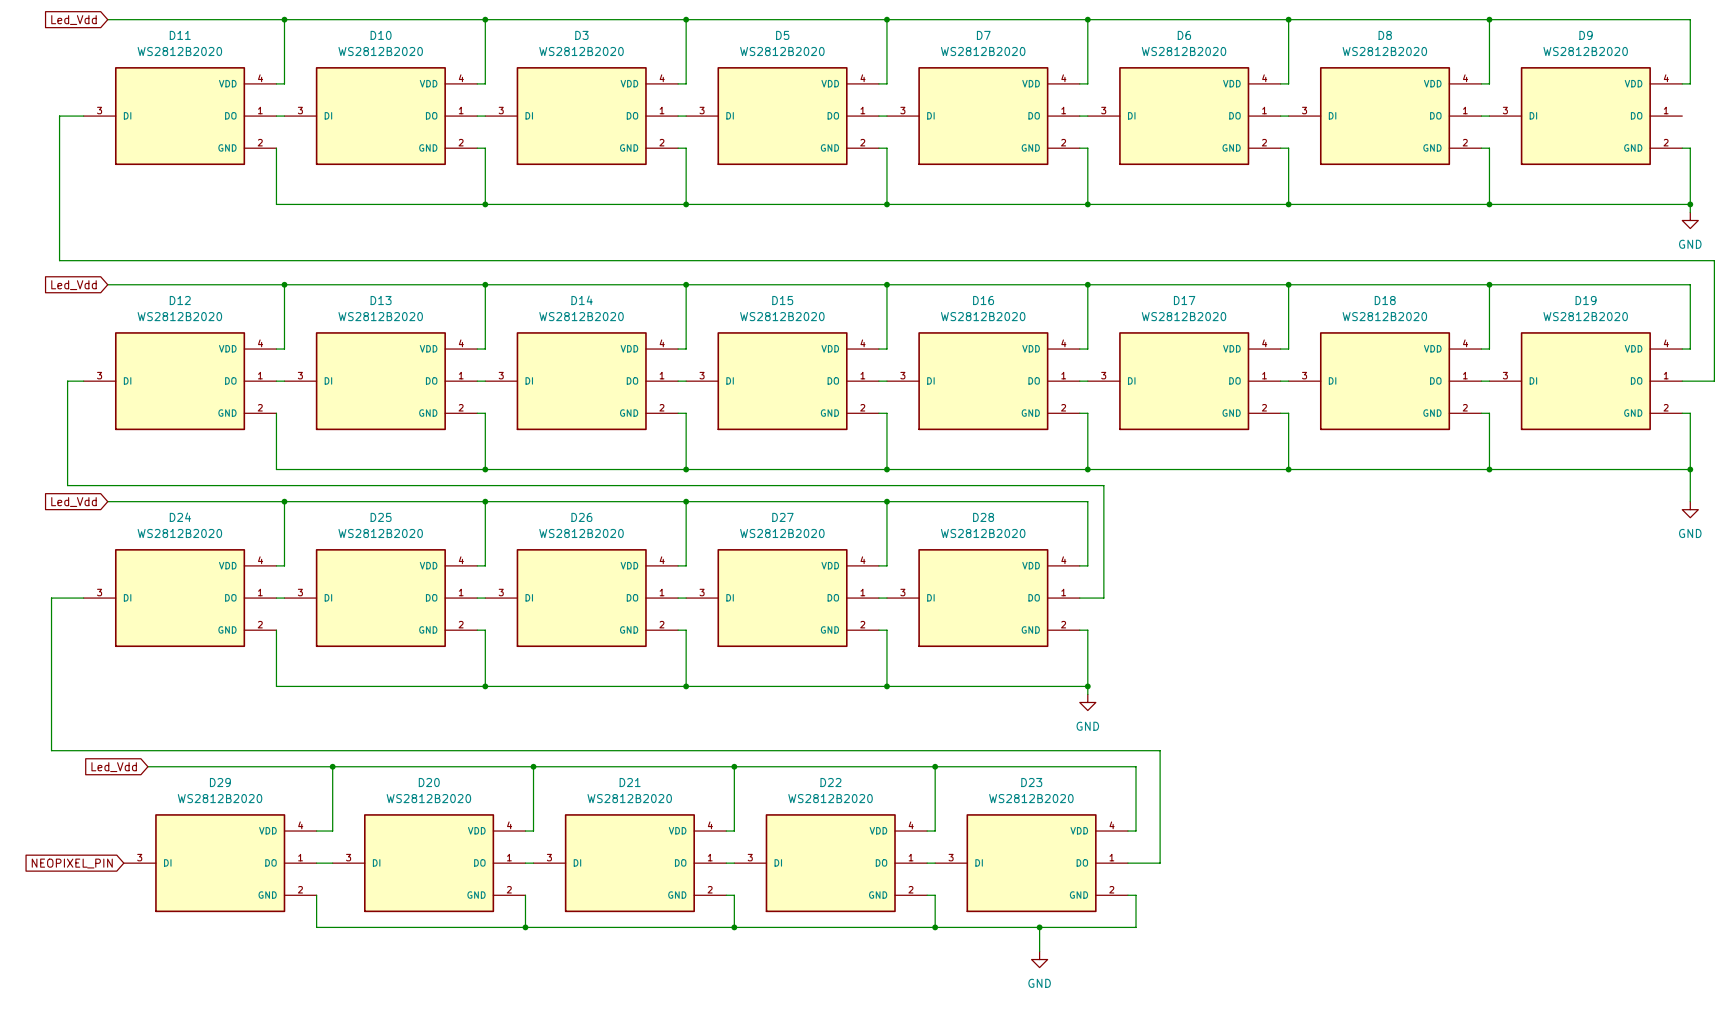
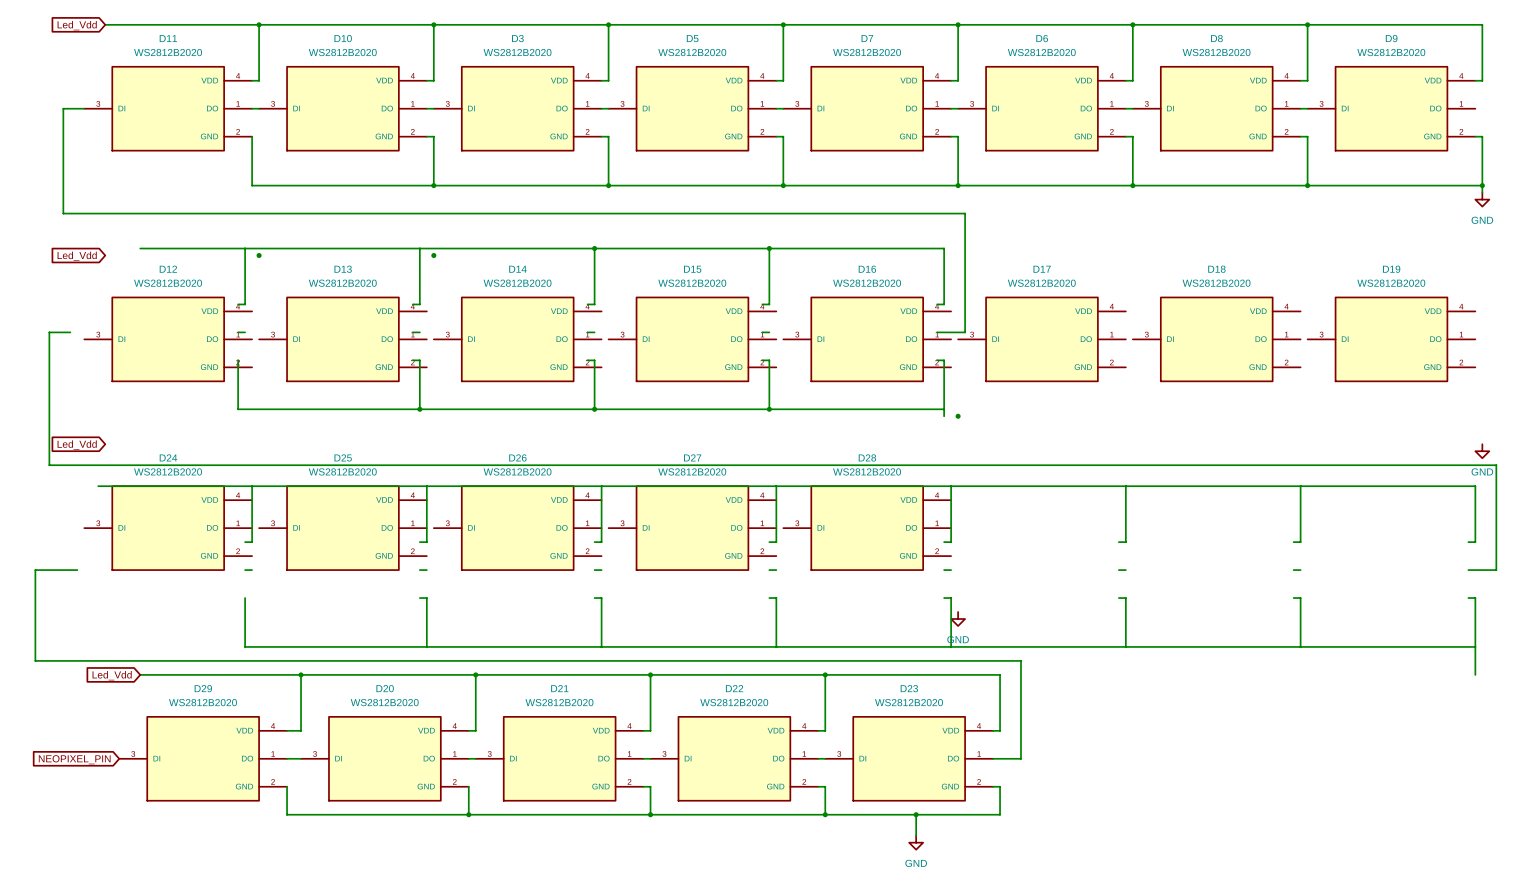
wire: (59, 236) (59, 260) (1714, 260) (1714, 381) (1682, 381) -> (63, 213) (965, 213) (965, 332) (937, 332)
wire: none -> (140, 248) (944, 248) (944, 304) (937, 304)
wire: (107, 284) (1690, 284) (1690, 349) (1682, 349) -> none
wire: (284, 284) (284, 349) (276, 349) -> (245, 248) (245, 304) (238, 304)
wire: (485, 284) (485, 349) (477, 349) -> (419, 248) (419, 304) (412, 304)
wire: (686, 284) (686, 349) (678, 349) -> (594, 248) (594, 304) (587, 304)
junction position: (686, 284) -> (594, 248)
wire: (886, 284) (886, 349) (878, 349) -> (769, 248) (769, 304) (762, 304)
junction position: (886, 284) -> (769, 248)
wire: (1087, 284) (1087, 349) (1079, 349) -> none
junction: (1087, 284) -> none
wire: (1288, 284) (1288, 349) (1280, 349) -> none
junction: (1288, 284) -> none
wire: (1489, 284) (1489, 349) (1481, 349) -> none
junction: (1489, 284) -> none
wire: none -> (70, 332) (49, 332) (49, 465) (1496, 465) (1496, 570) (1468, 570)
wire: (83, 381) (67, 381) (67, 485) (1103, 485) (1103, 598) (1079, 598) -> none
wire: (276, 381) (284, 381) -> (238, 332) (245, 332)
wire: (477, 381) (485, 381) -> (412, 332) (419, 332)
wire: (678, 381) (686, 381) -> (587, 332) (594, 332)
wire: (878, 381) (886, 381) -> (762, 332) (769, 332)
wire: (1079, 381) (1087, 381) -> none
wire: (1280, 381) (1288, 381) -> none
wire: (1481, 381) (1489, 381) -> none
wire: none -> (238, 360) (238, 409) (944, 409)
wire: none -> (937, 360) (944, 360) (944, 416)
wire: (276, 413) (276, 469) (1690, 469) -> none
wire: (477, 413) (485, 413) (485, 469) -> (412, 360) (419, 360) (419, 409)
wire: (678, 413) (686, 413) (686, 469) -> (587, 360) (594, 360) (594, 409)
wire: (878, 413) (886, 413) (886, 469) -> (762, 360) (769, 360) (769, 409)
wire: (1079, 413) (1087, 413) (1087, 469) -> none
wire: (1280, 413) (1288, 413) (1288, 469) -> none
wire: (1481, 413) (1489, 413) (1489, 469) -> none
wire: (1682, 413) (1690, 413) (1690, 501) -> none
junction position: (485, 469) -> (419, 409)
junction position: (686, 469) -> (594, 409)
junction position: (886, 469) -> (769, 409)
junction: (1288, 469) -> none
junction: (1489, 469) -> none
junction: (1690, 469) -> none
wire: (107, 501) (1087, 501) (1087, 565) (1079, 565) -> none
wire: (284, 501) (284, 565) (276, 565) -> (252, 486) (252, 542) (245, 542)
junction: (284, 501) -> none
wire: (485, 501) (485, 565) (477, 565) -> (426, 486) (426, 542) (419, 542)
junction: (485, 501) -> none
wire: (686, 501) (686, 565) (678, 565) -> (601, 486) (601, 542) (594, 542)
junction: (686, 501) -> none
wire: (886, 501) (886, 565) (878, 565) -> (776, 486) (776, 542) (769, 542)
junction: (886, 501) -> none
wire: none -> (98, 486) (1475, 486) (1475, 542) (1468, 542)
wire: none -> (951, 486) (951, 542) (944, 542)
wire: none -> (1125, 486) (1125, 542) (1118, 542)
wire: none -> (1300, 486) (1300, 542) (1293, 542)
wire: (83, 598) (51, 598) (51, 750) -> (77, 570) (35, 570) (35, 660) (56, 660)
wire: (276, 598) (284, 598) -> (245, 570) (252, 570)
wire: (477, 598) (485, 598) -> (419, 570) (426, 570)
wire: (678, 598) (686, 598) -> (594, 570) (601, 570)
wire: (878, 598) (886, 598) -> (769, 570) (776, 570)
wire: (276, 630) (276, 686) (1087, 686) -> none
wire: (477, 630) (485, 630) (485, 686) -> (419, 598) (426, 598) (426, 646)
wire: (678, 630) (686, 630) (686, 686) -> (594, 598) (601, 598) (601, 646)
wire: (878, 630) (886, 630) (886, 686) -> (769, 598) (776, 598) (776, 646)
wire: (1079, 630) (1087, 630) (1087, 694) -> none
wire: none -> (944, 570) (951, 570)
wire: none -> (1118, 570) (1125, 570)
wire: none -> (1293, 570) (1300, 570)
wire: none -> (245, 598) (245, 646) (1475, 646)
wire: none -> (944, 598) (951, 598) (951, 646)
wire: none -> (1118, 598) (1125, 598) (1125, 646)
wire: none -> (1293, 598) (1300, 598) (1300, 646)
wire: none -> (1468, 598) (1475, 598) (1475, 674)
junction: (485, 686) -> none
junction: (686, 686) -> none
junction: (886, 686) -> none
junction: (1087, 686) -> none

